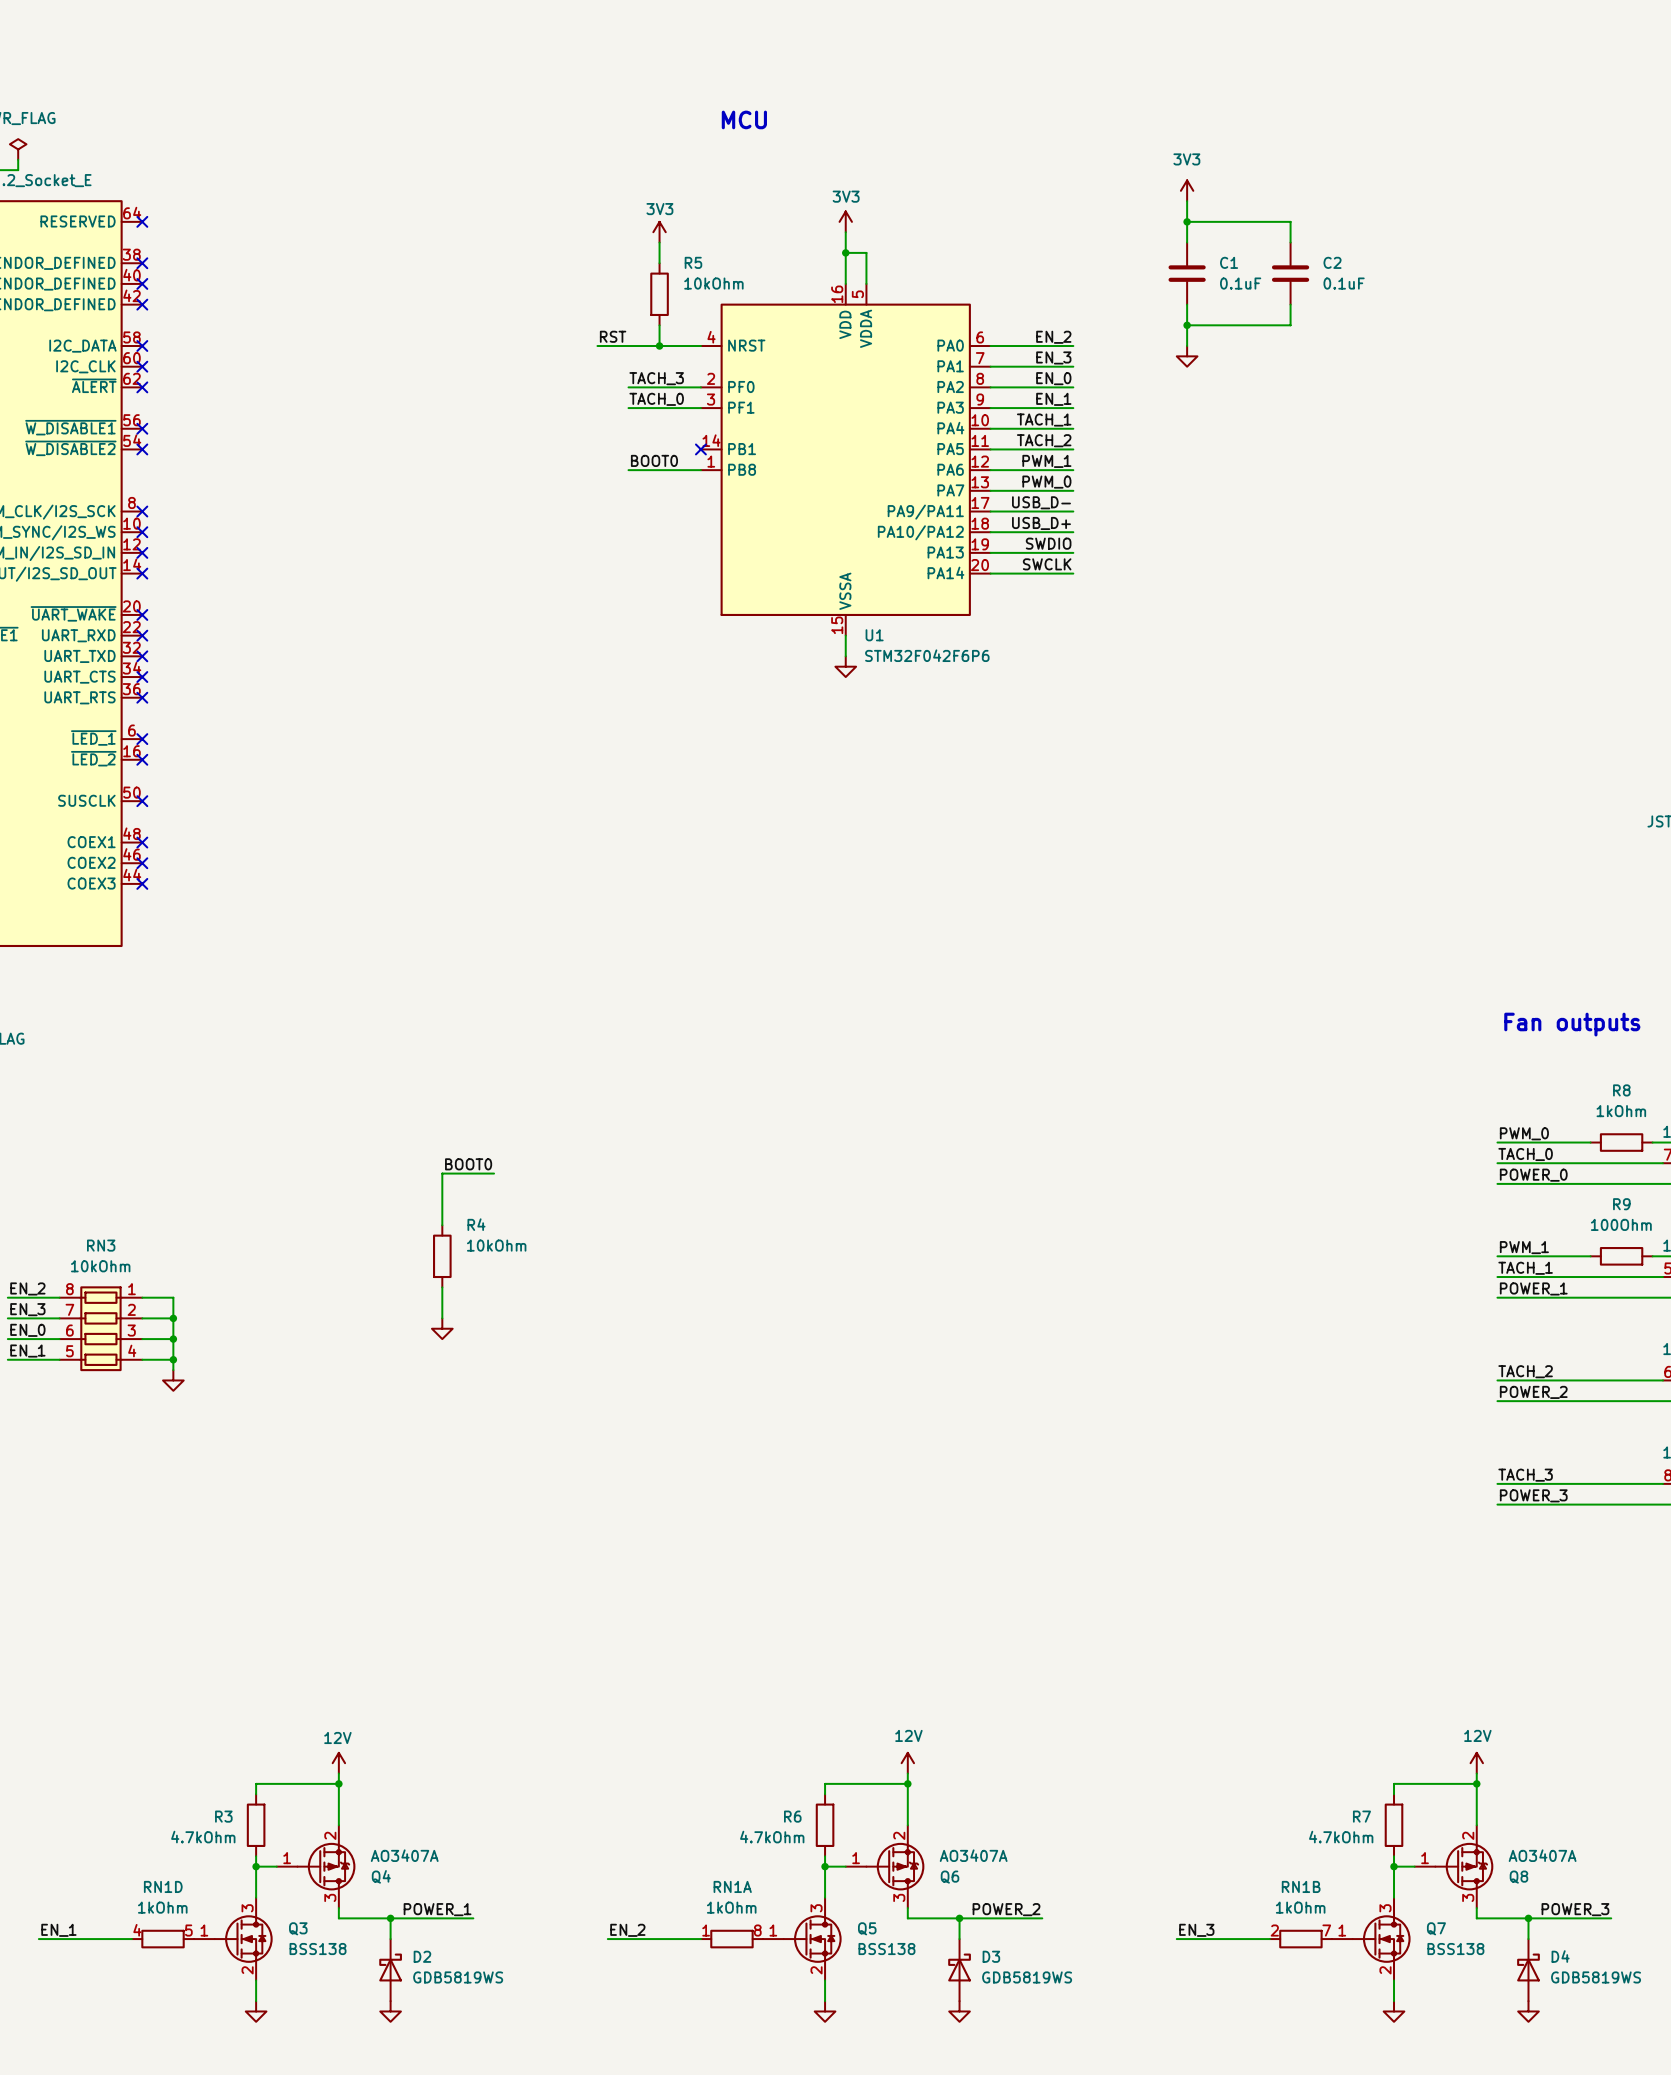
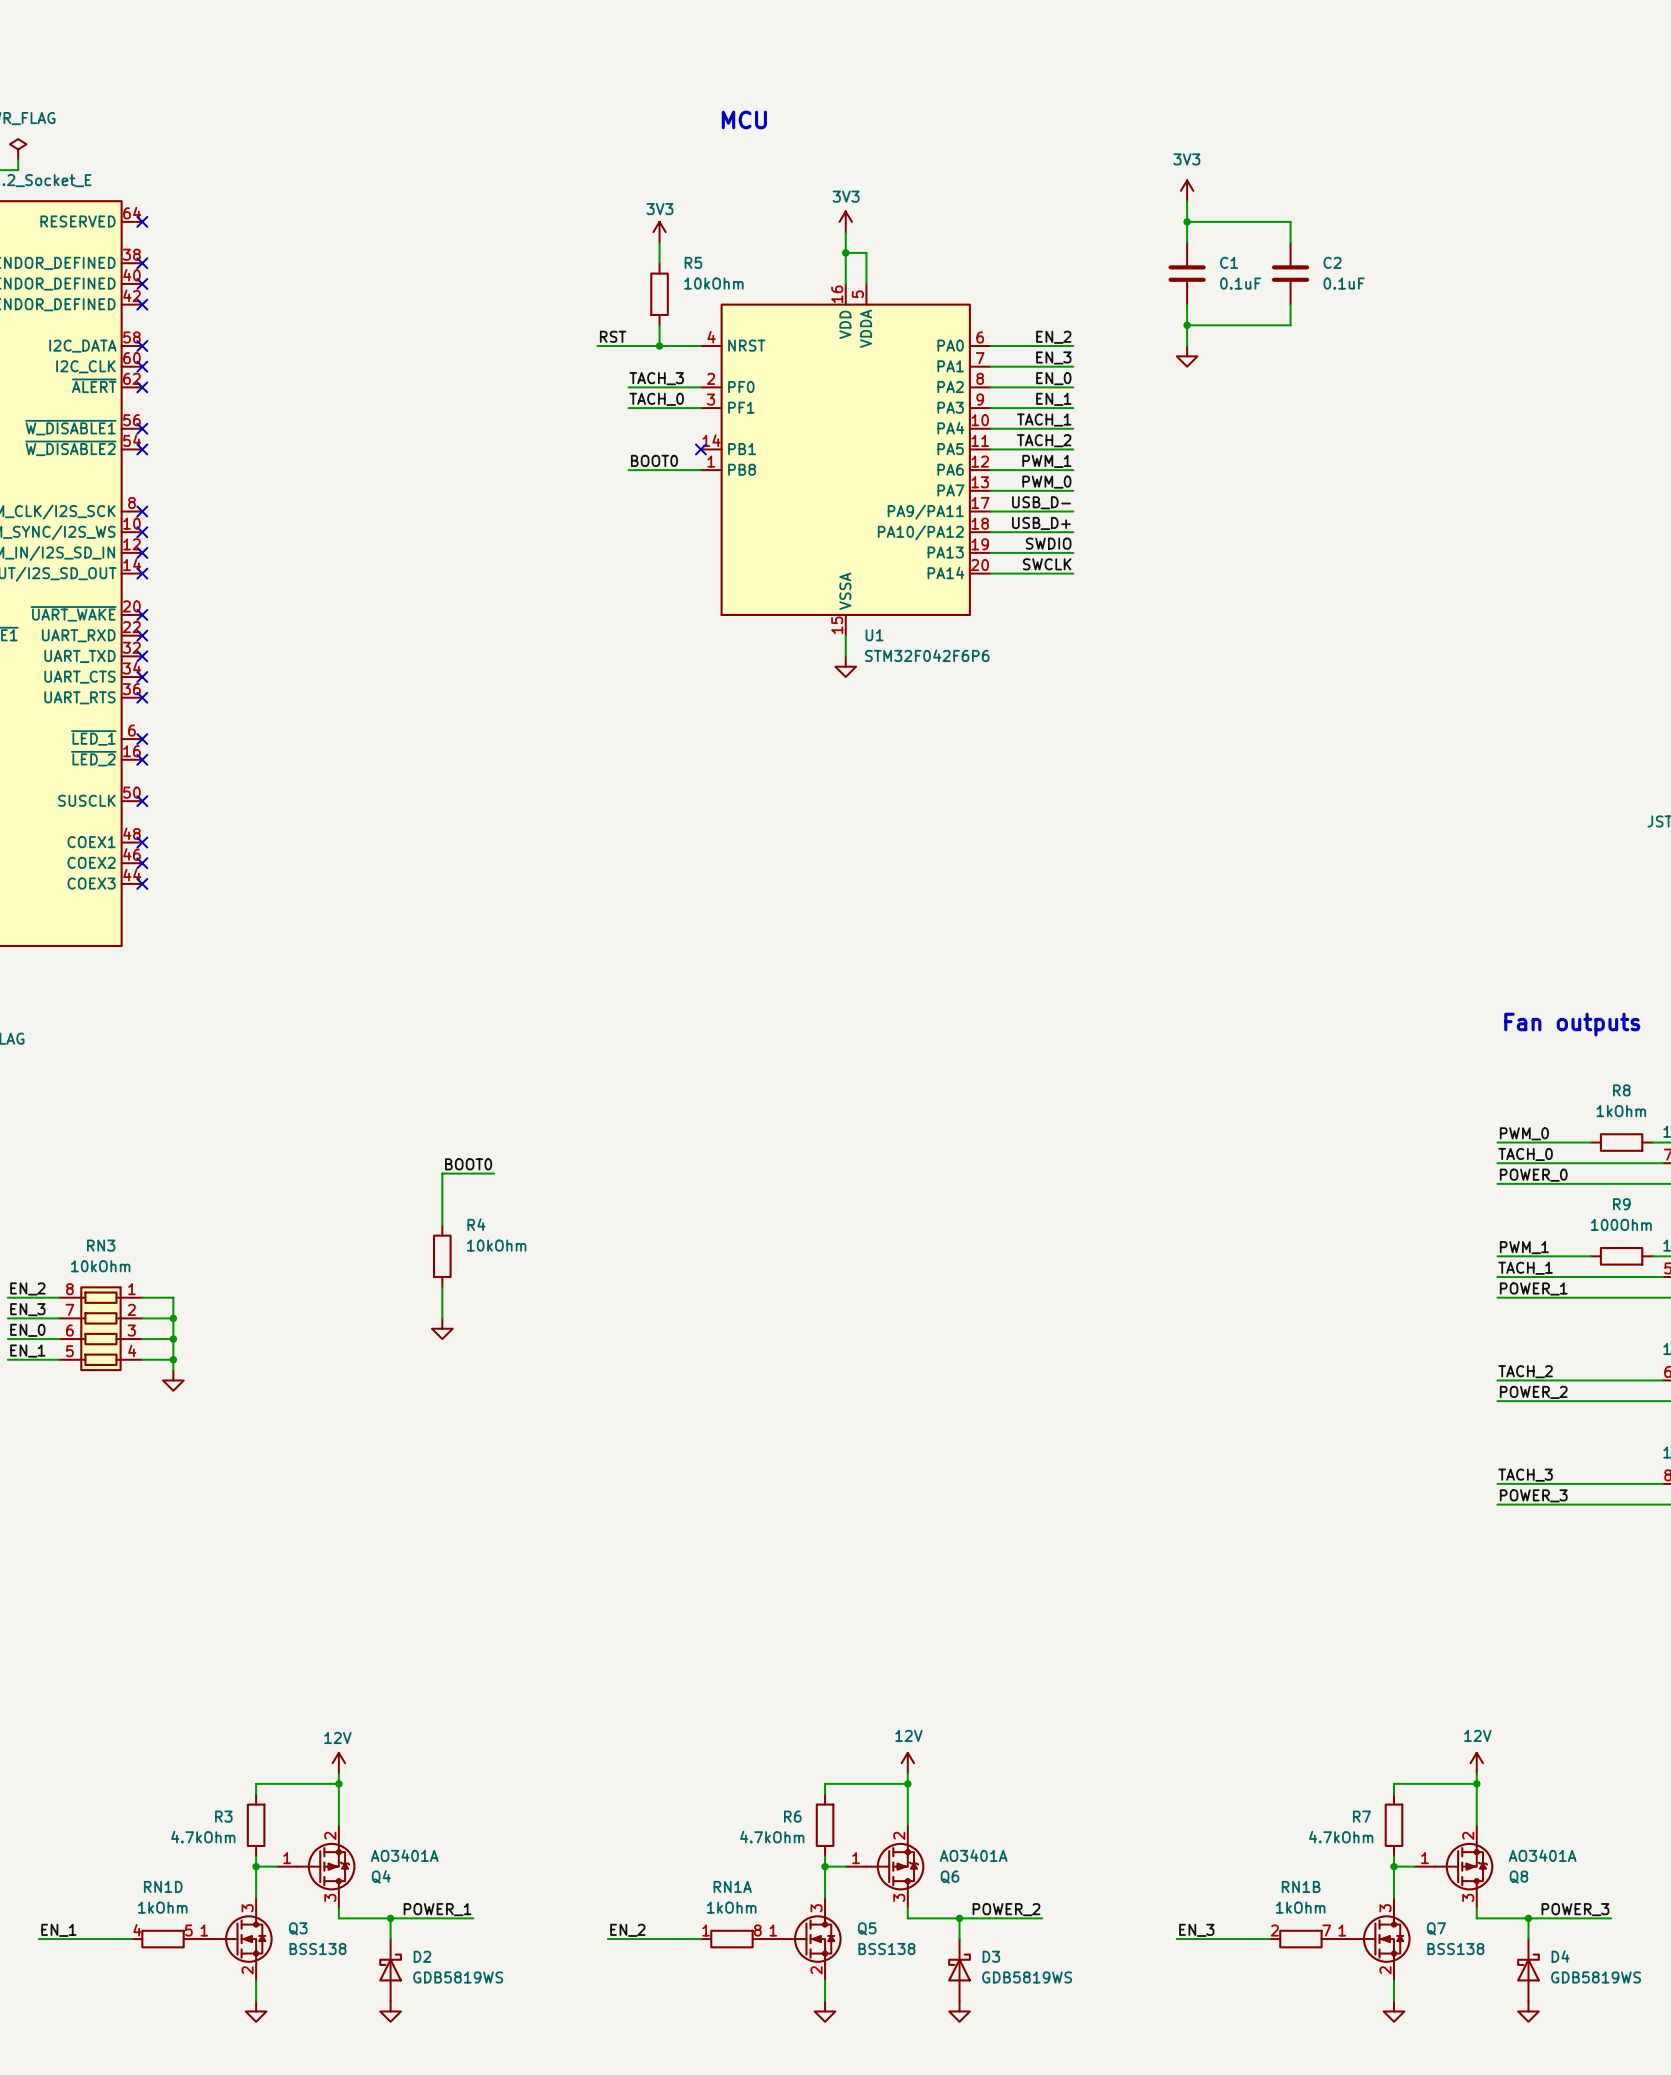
Q4 value: AO3407A (404, 1855) -> AO3401A (404, 1855)
Q6 value: AO3407A (973, 1855) -> AO3401A (973, 1855)
Q8 value: AO3407A (1542, 1855) -> AO3401A (1542, 1855)

